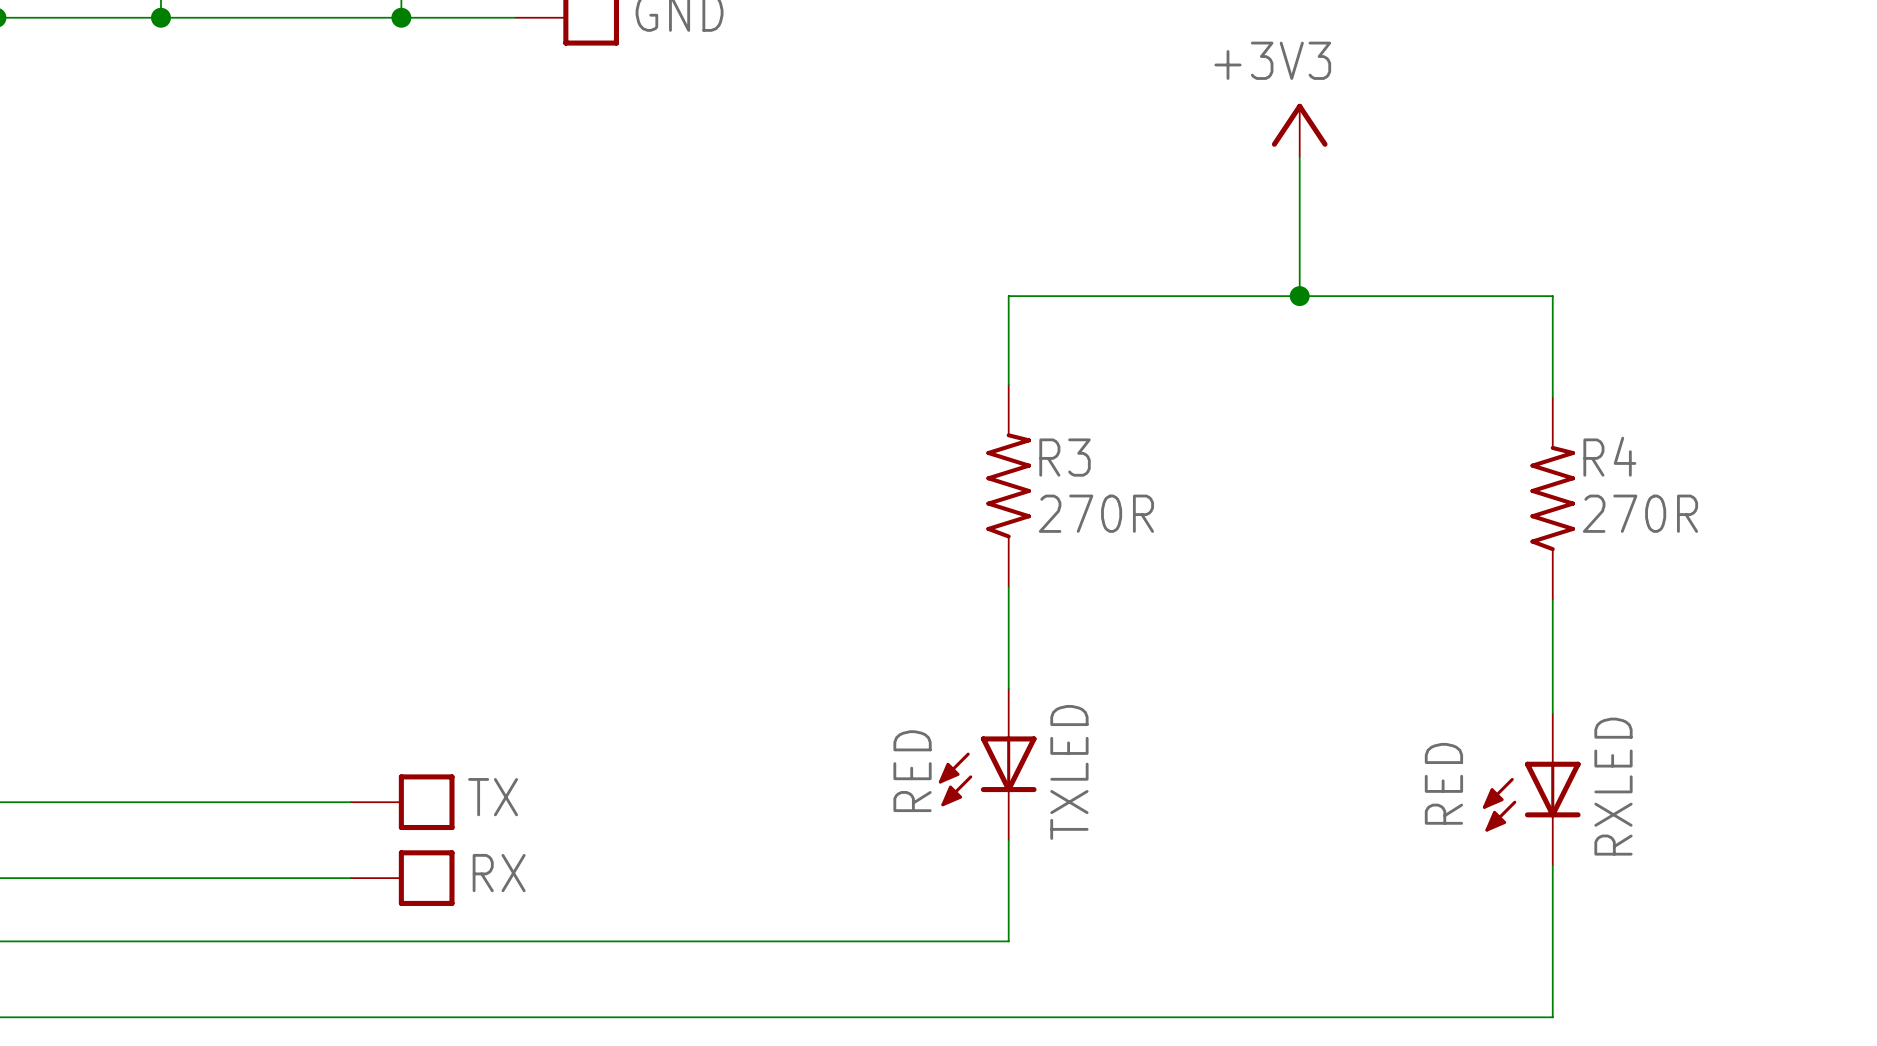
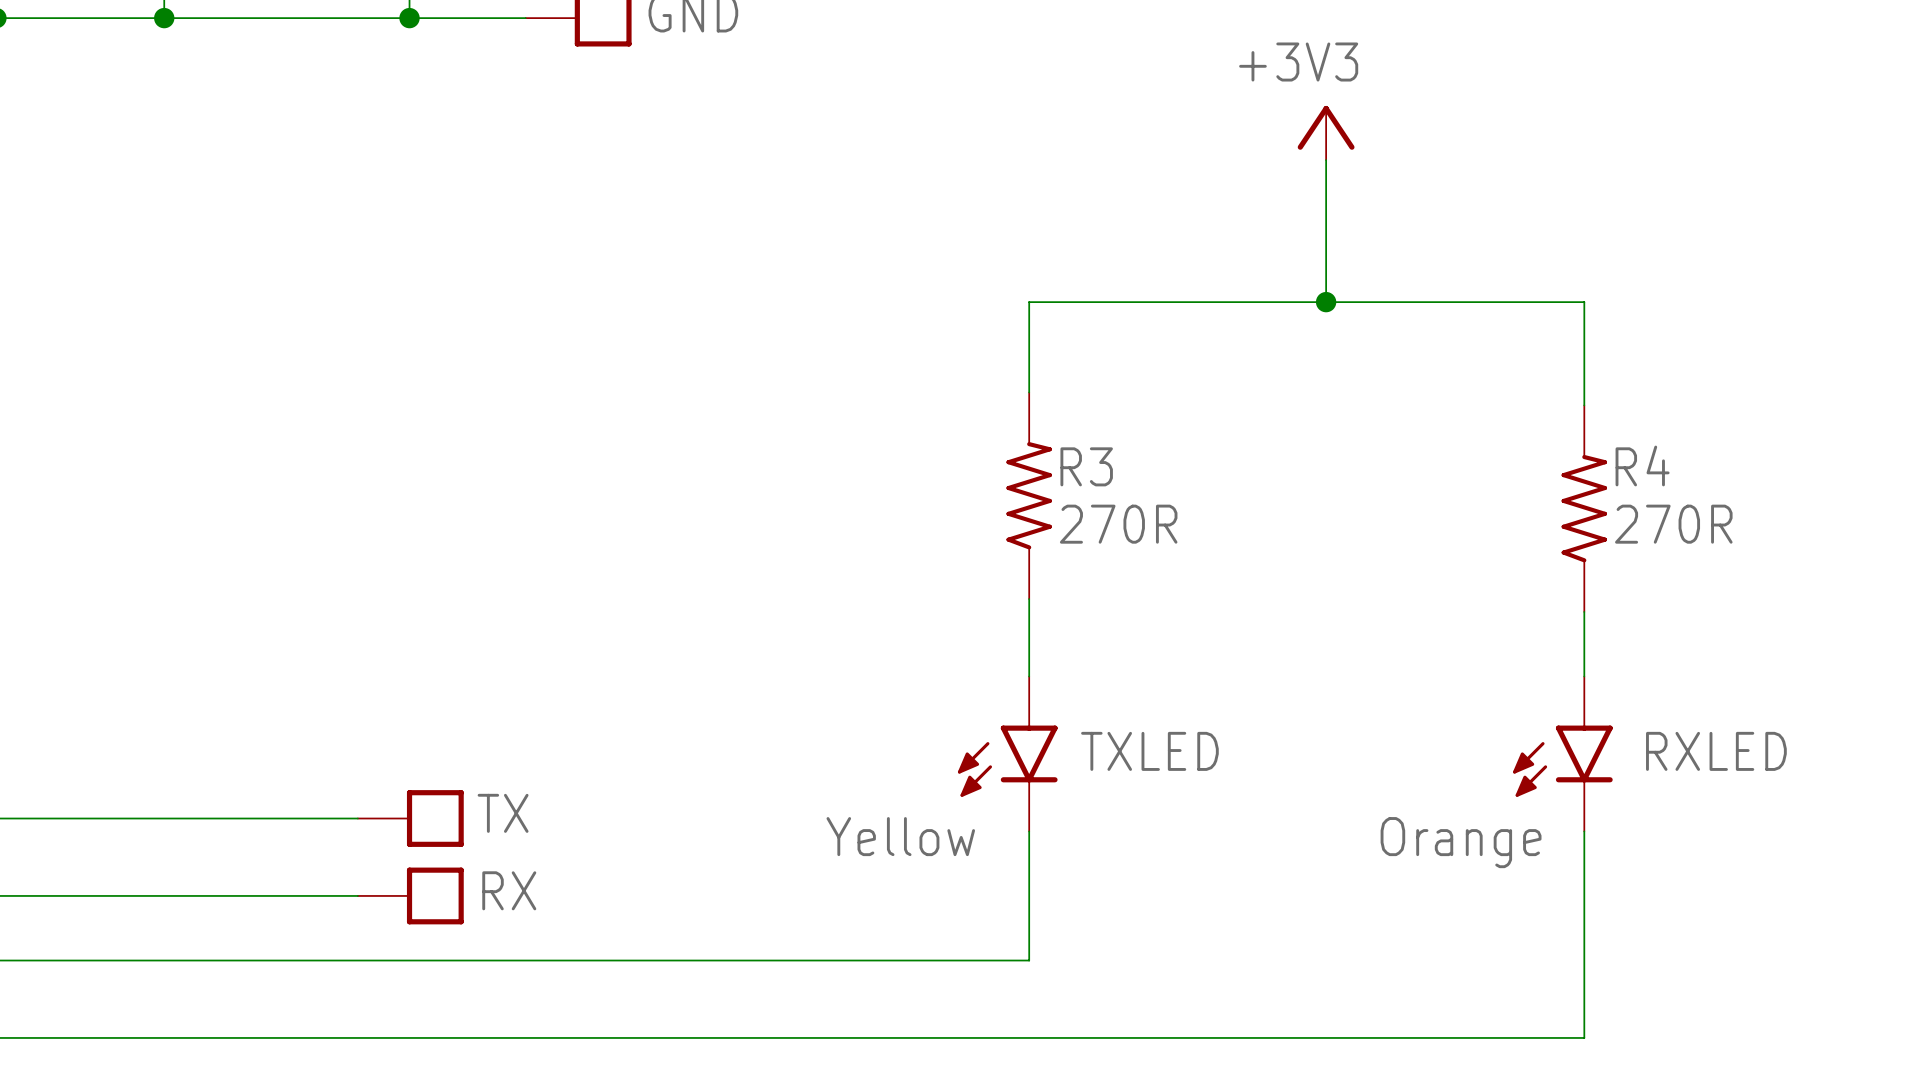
TXLED: none -> Yellow (1007, 753)
RXLED: none -> Orange (1562, 753)
TXLED: RED (987, 764) -> none
RXLED: RED (1531, 789) -> none

